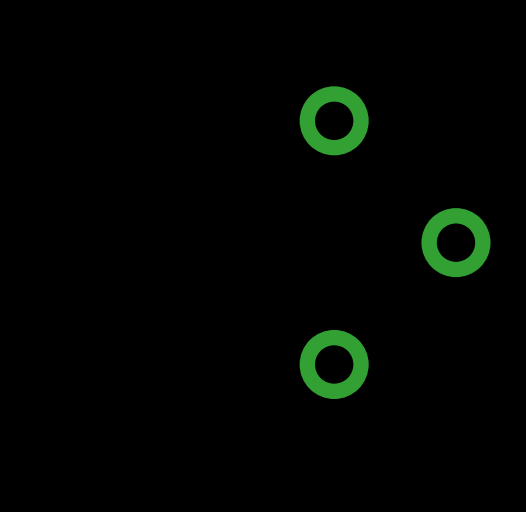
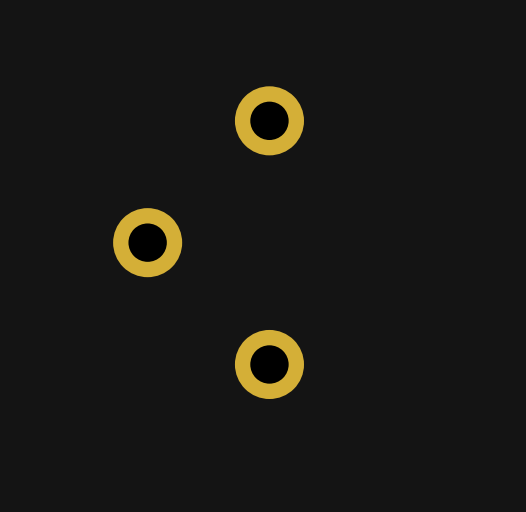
part rotation: 0° (395, 242) -> 180° (208, 242)

